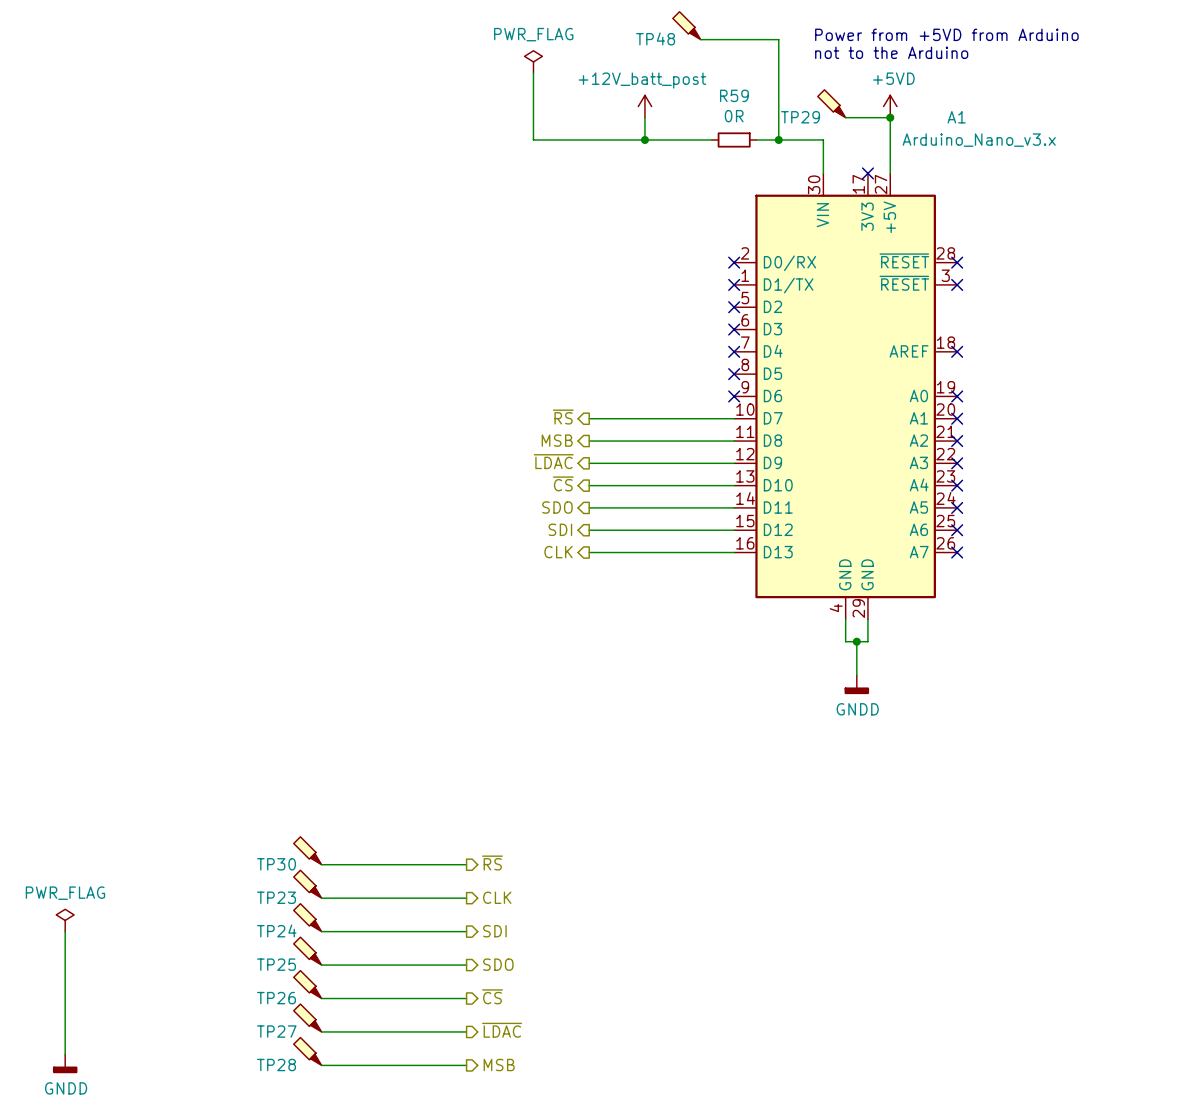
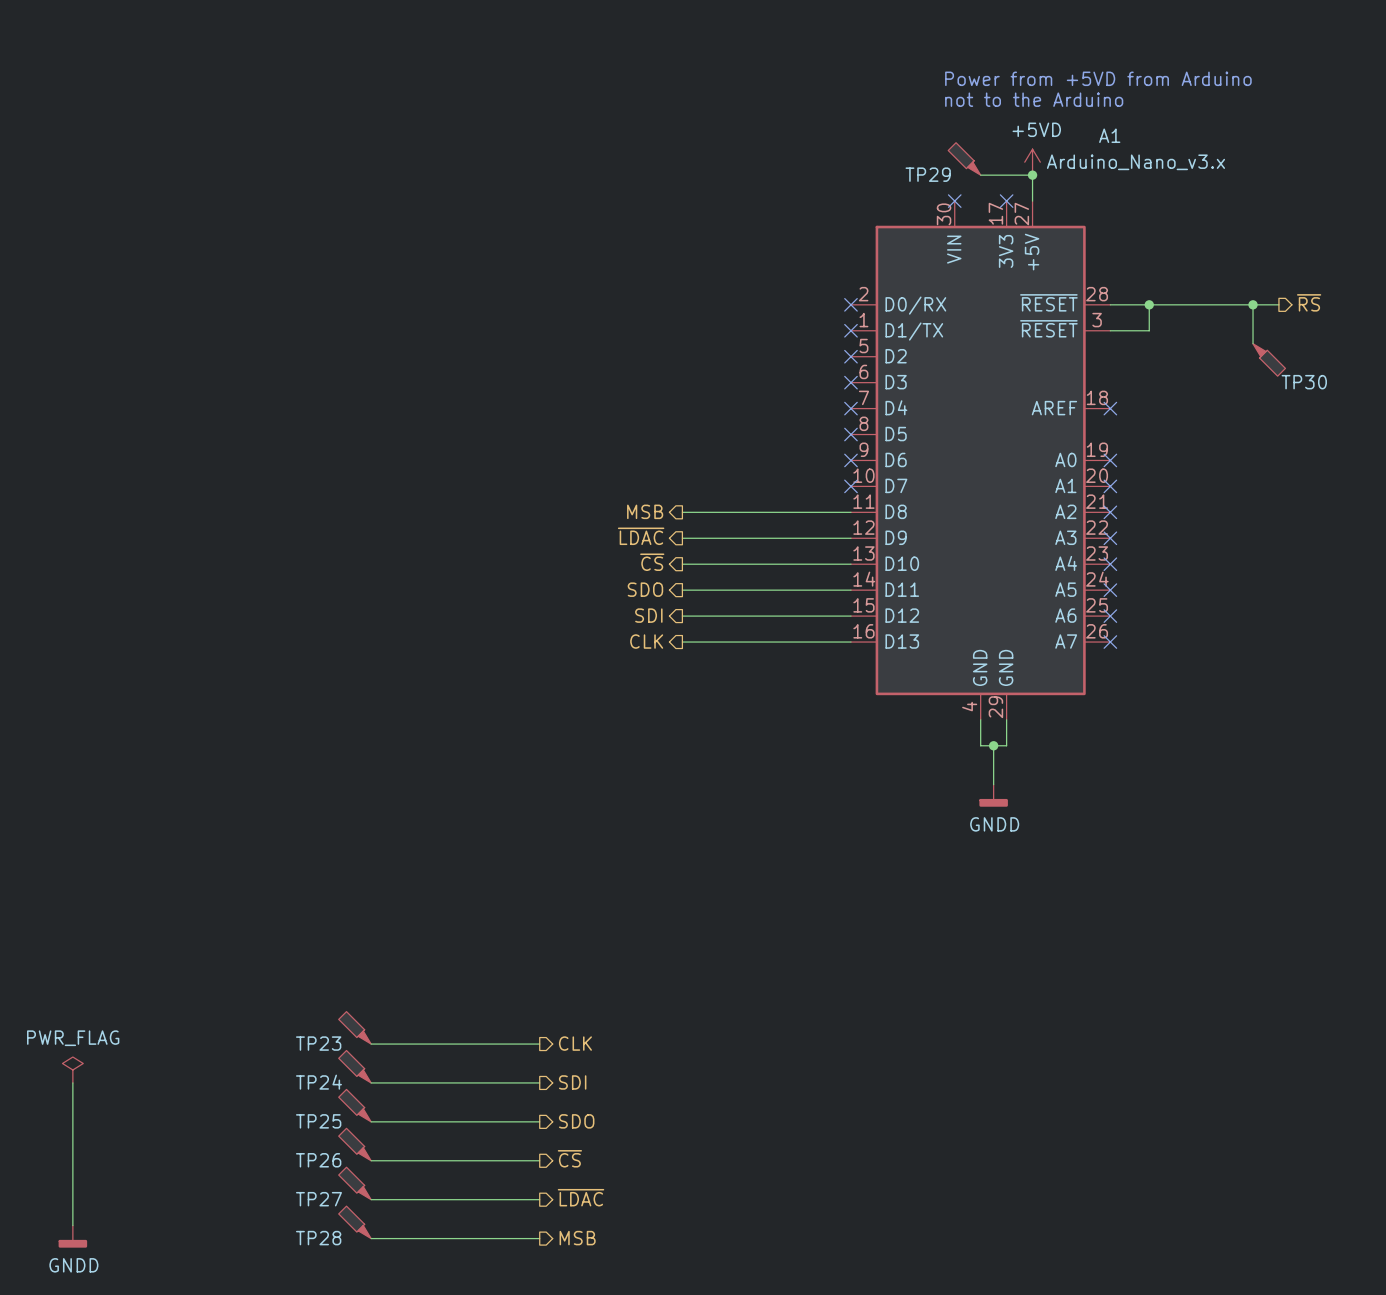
TP48: (686, 25) -> none
text position: Power from +5VD from Arduino (946, 34) -> Power from +5VD from Arduino (1098, 78)
wire: (700, 39) (778, 39) (778, 139) -> none
text position: not to the Arduino (891, 52) -> not to the Arduino (1034, 99)
power symbol: PWR_FLAG (533, 61) -> none
wire: (533, 73) (533, 139) (711, 139) -> none
TP29 position: (831, 103) -> (964, 158)
power symbol: +12V_batt_post (644, 106) -> none
power symbol position: +5VD (890, 106) -> +5VD (1032, 162)
wire: (644, 117) (644, 139) -> none
wire: (845, 117) (890, 117) (890, 151) -> (980, 175) (1032, 175)
junction position: (890, 117) -> (1032, 175)
junction: (644, 139) -> none
R59: 0R (734, 139) -> none
wire: (756, 139) (823, 139) (823, 173) -> none
junction: (778, 139) -> none
no-connect mark: none -> (954, 201)
hierarchical label: none -> ~{RS} (1309, 302)
wire: none -> (1110, 304) (1278, 304)
no-connect mark: (957, 262) -> none
wire: none -> (1149, 304) (1149, 330) (1110, 330)
junction: none -> (1149, 304)
wire: none -> (1253, 304) (1253, 343)
junction: none -> (1253, 304)
no-connect mark: (957, 284) -> none
hierarchical label: ~{RS} (563, 417) -> none
wire: (589, 418) (734, 418) -> none
no-connect mark: none -> (850, 486)
TP30 rotation: 0° (307, 850) -> 180° (1269, 359)
TP30 position: (307, 850) -> (1269, 359)
hierarchical label: ~{RS} (492, 863) -> none
TP30 name position: TP30 (276, 864) -> TP30 (1304, 382)
wire: (321, 864) (466, 864) -> none

